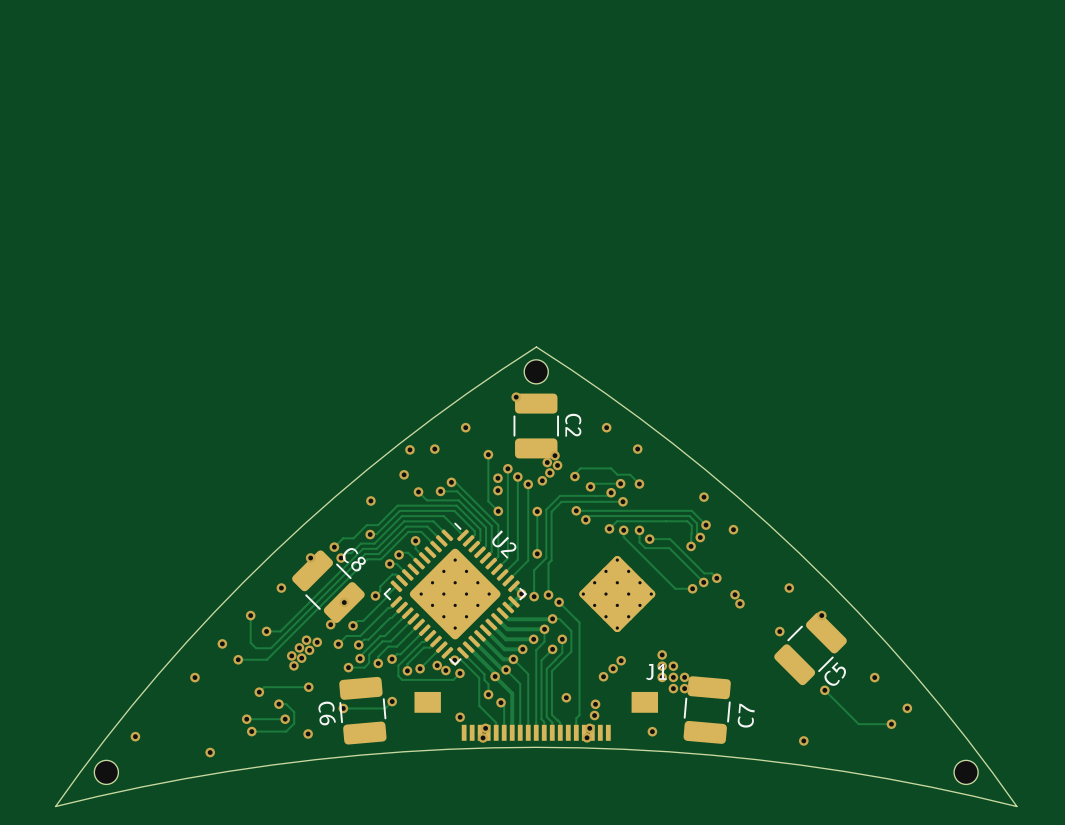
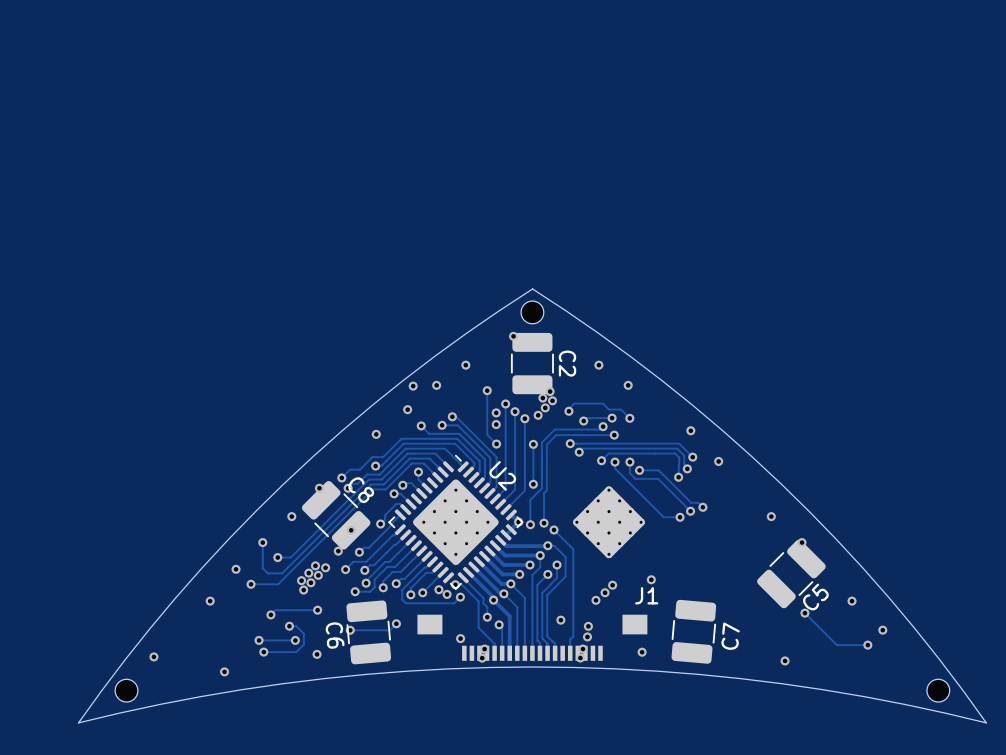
via: (734, 594) -> none
via: (739, 603) -> none
via: (779, 631) -> none
via: (662, 666) -> none
via: (673, 666) -> none
via: (662, 677) -> none
via: (673, 677) -> none
via: (684, 677) -> none
via: (673, 688) -> none
via: (684, 688) -> none

